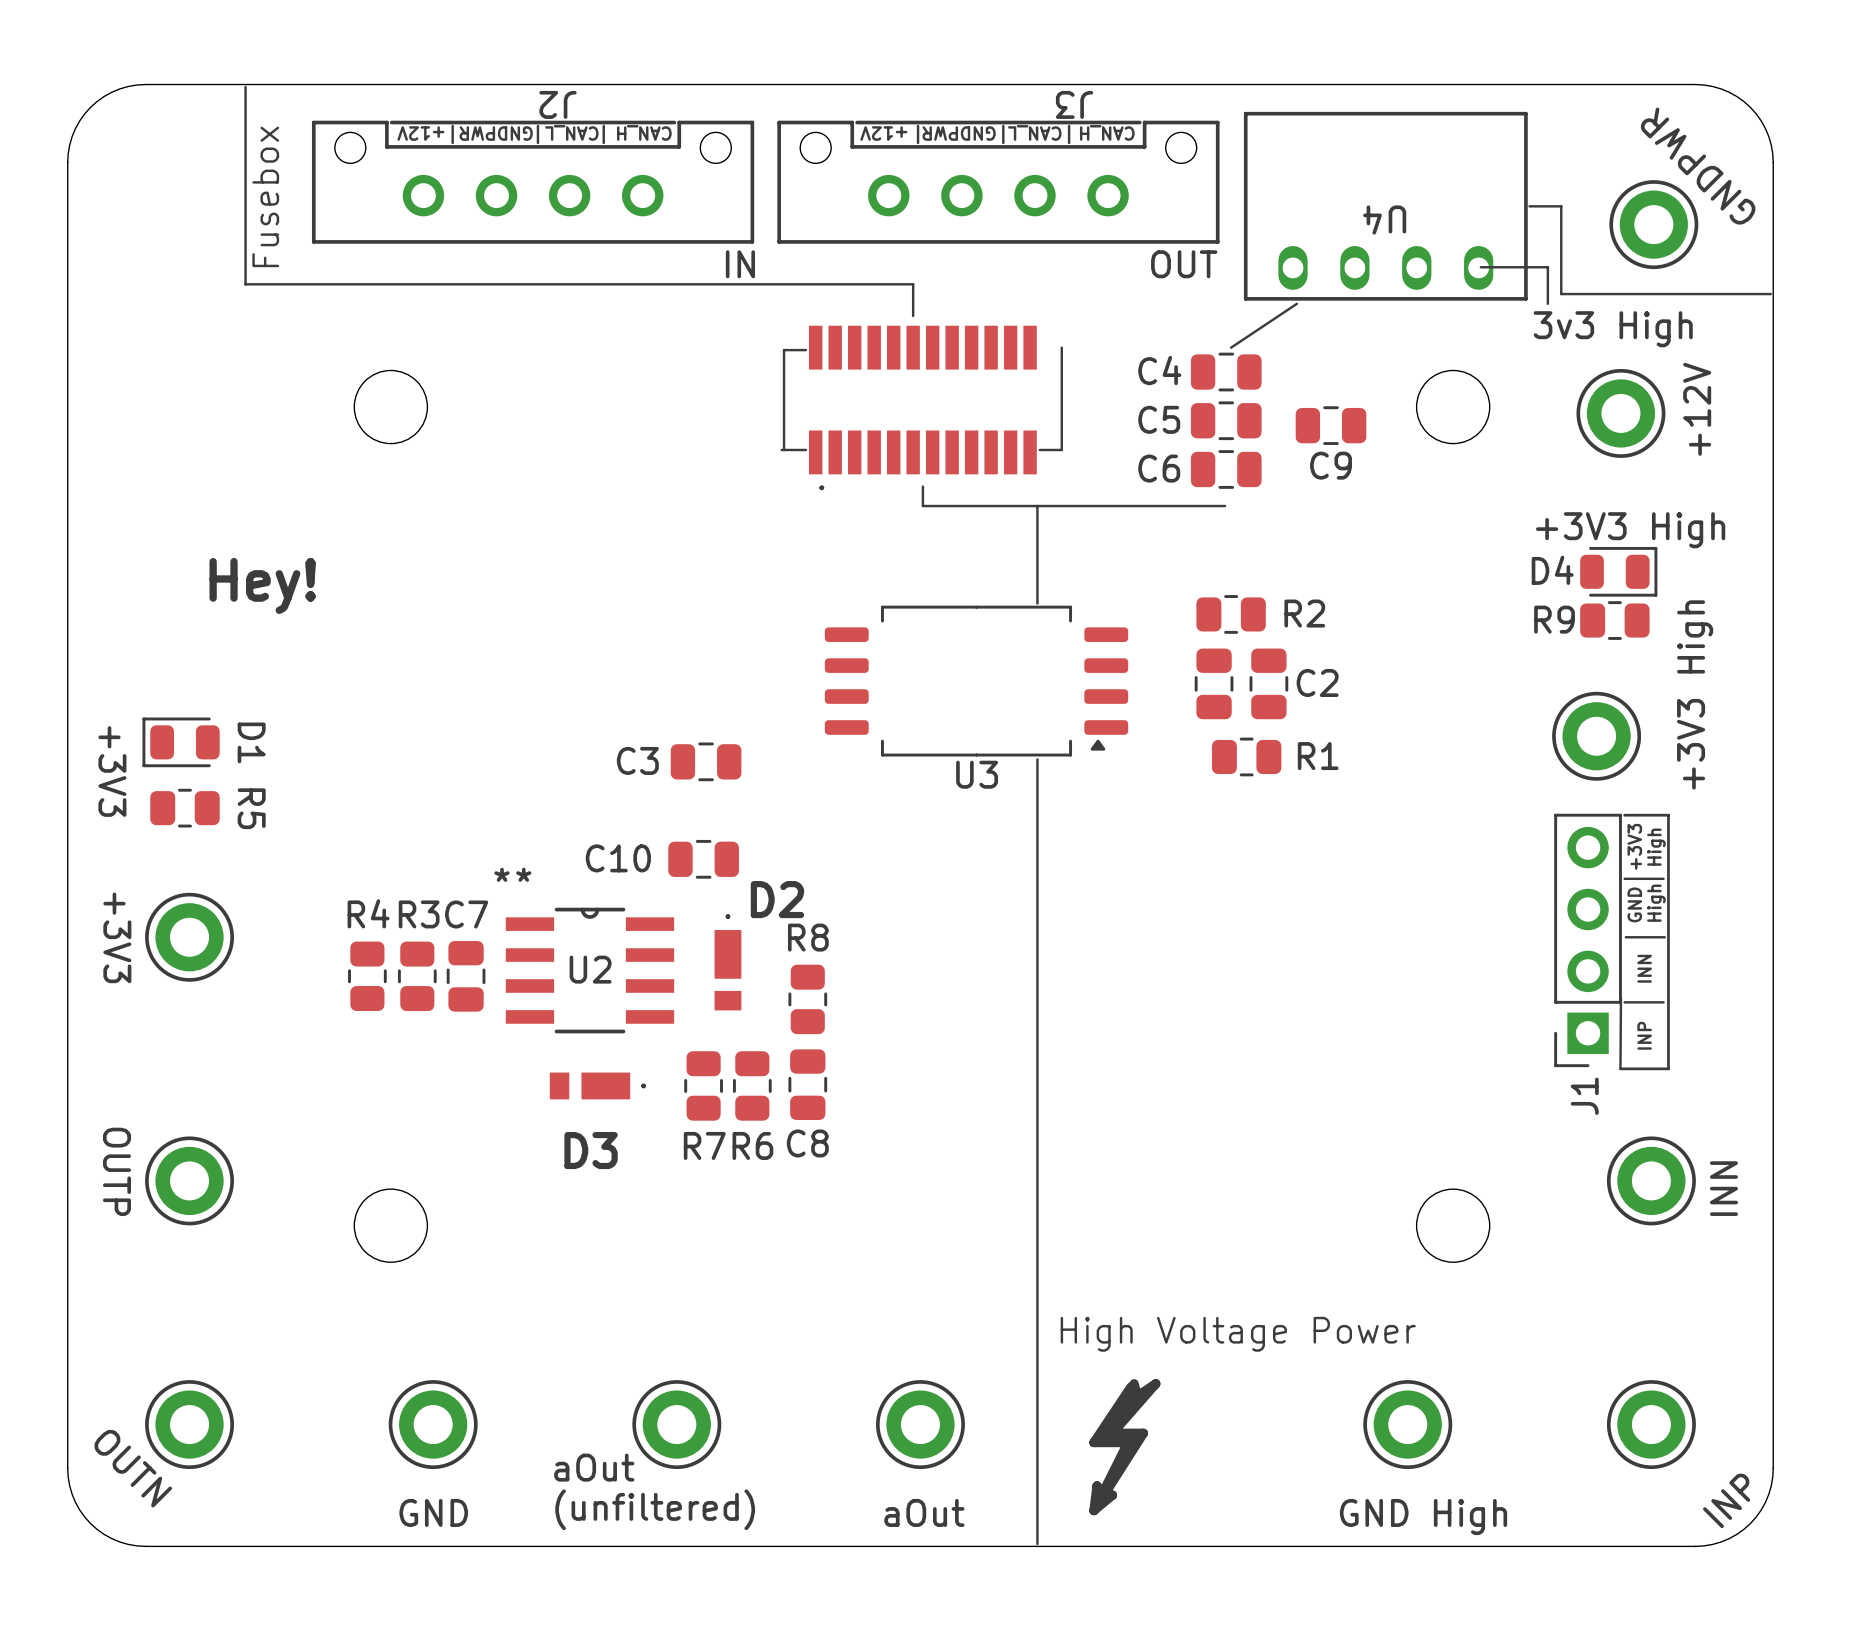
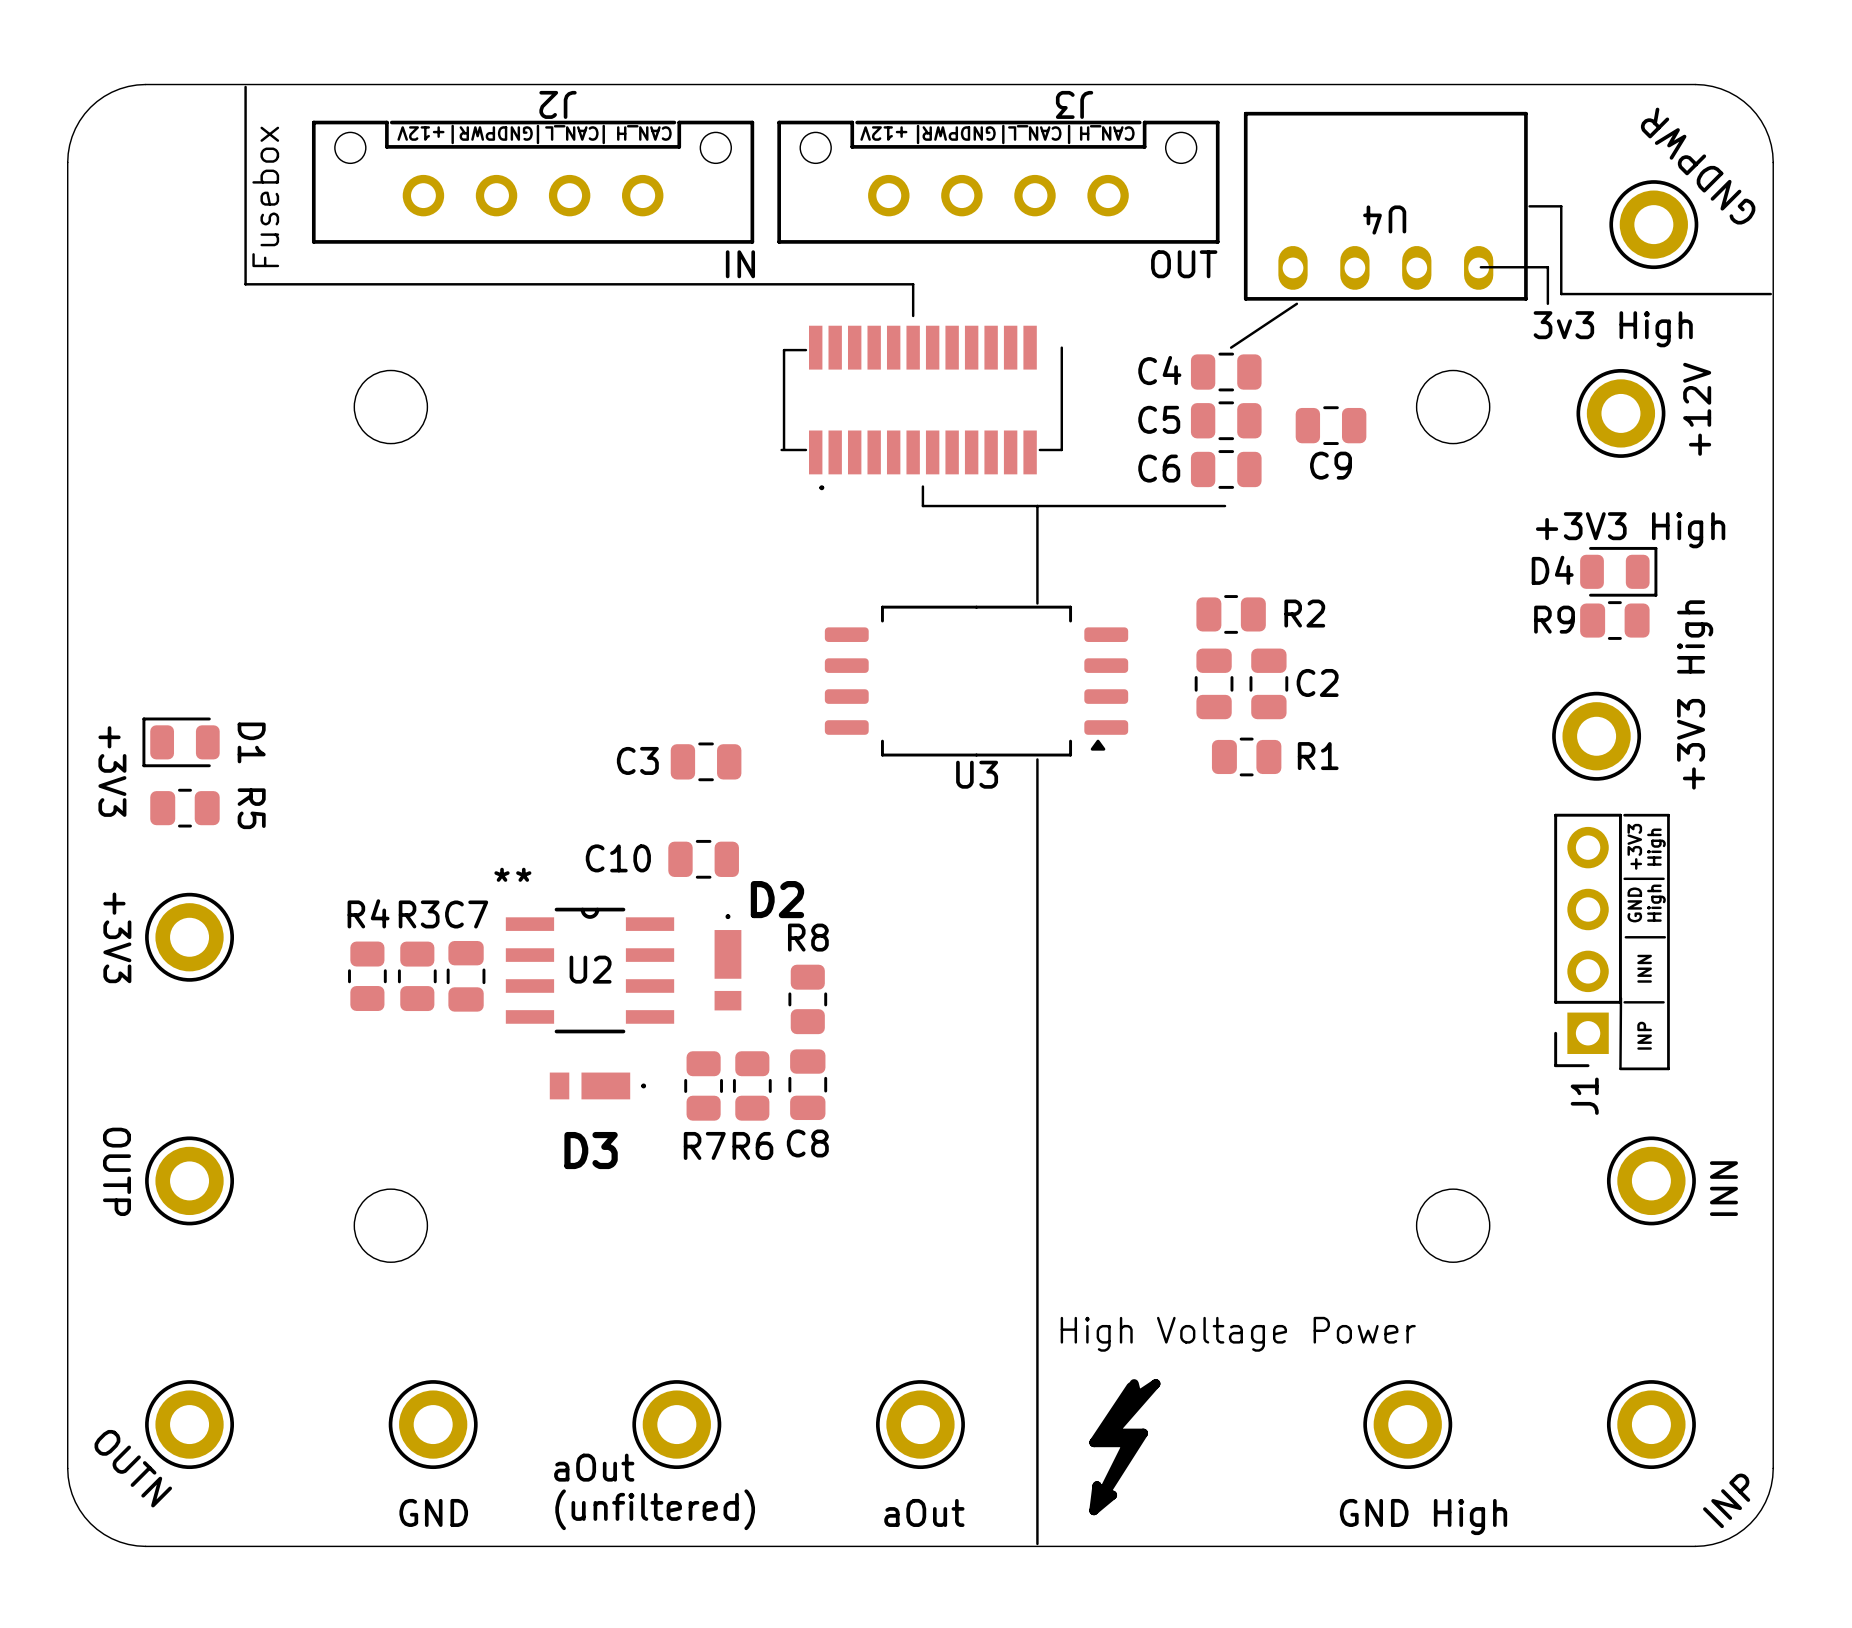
text: Hey! (262, 585) -> none

